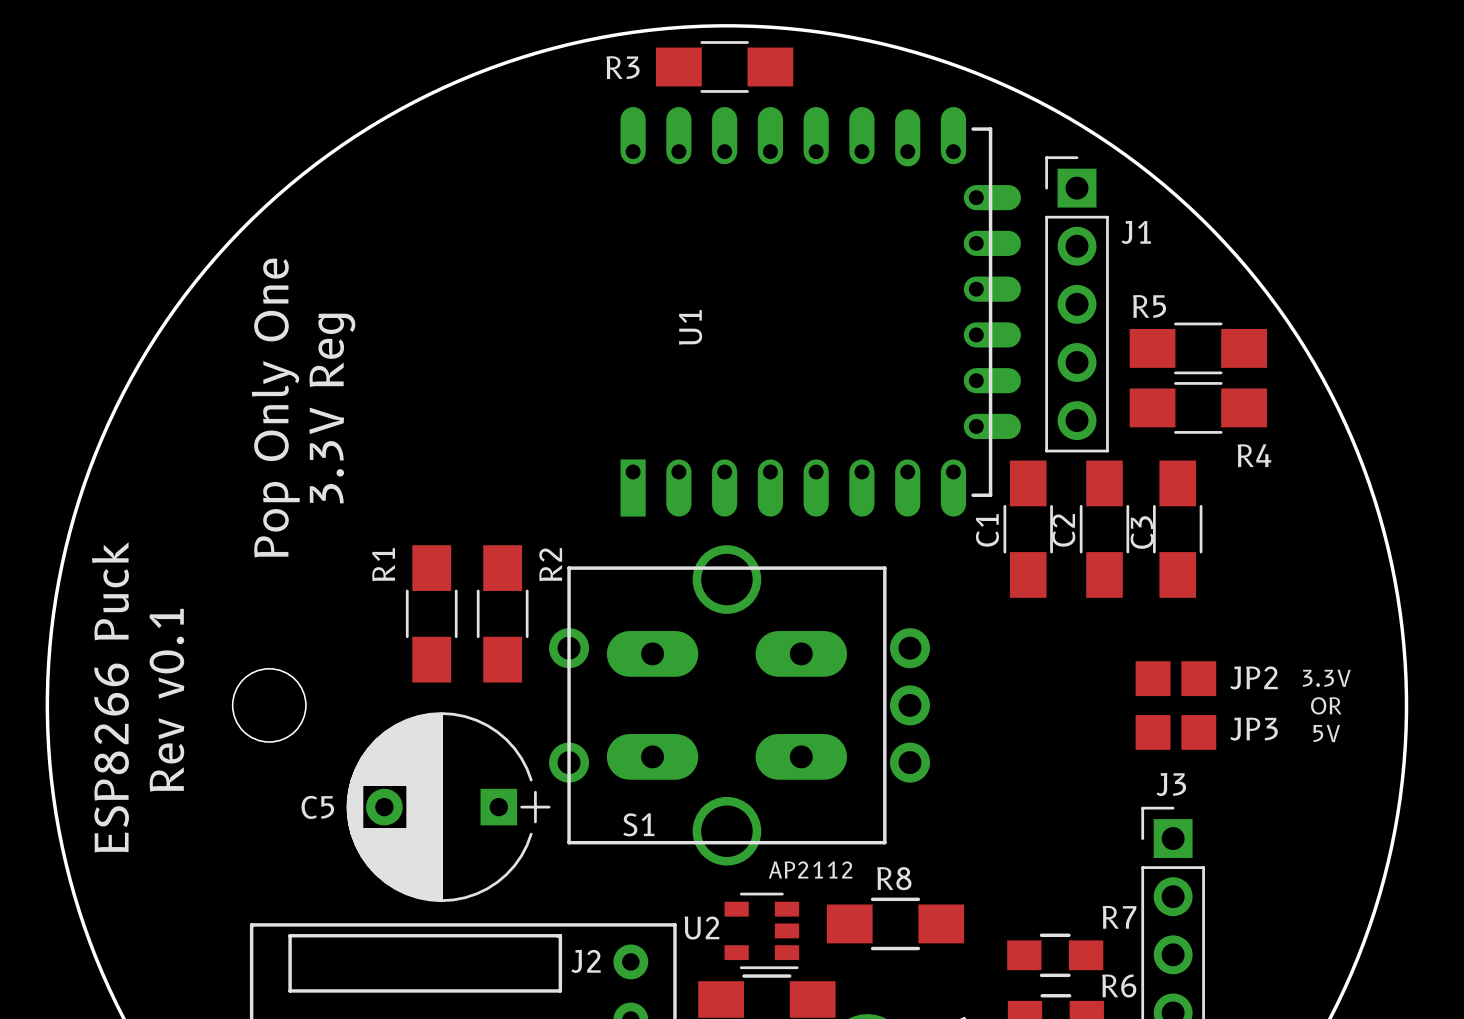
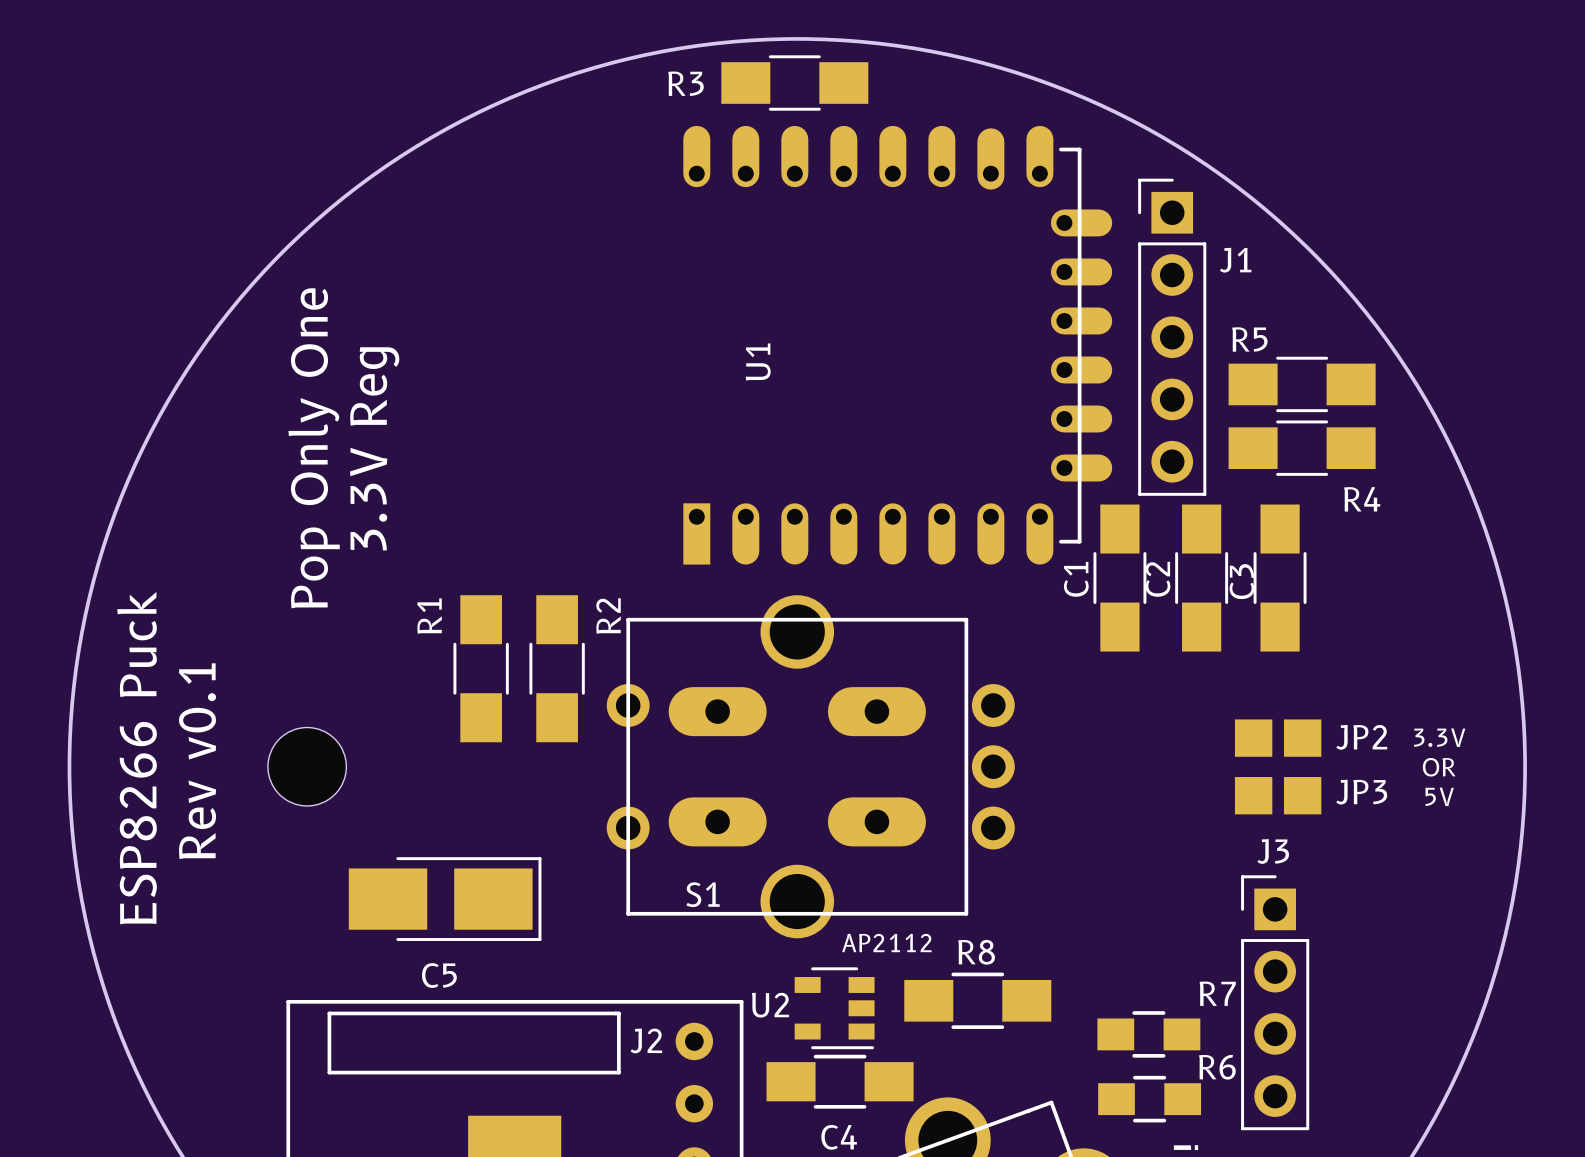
C5 footprint: [346, 712, 551, 903] -> [348, 857, 542, 941]
C5 name position: C5 (317, 807) -> C5 (439, 975)

